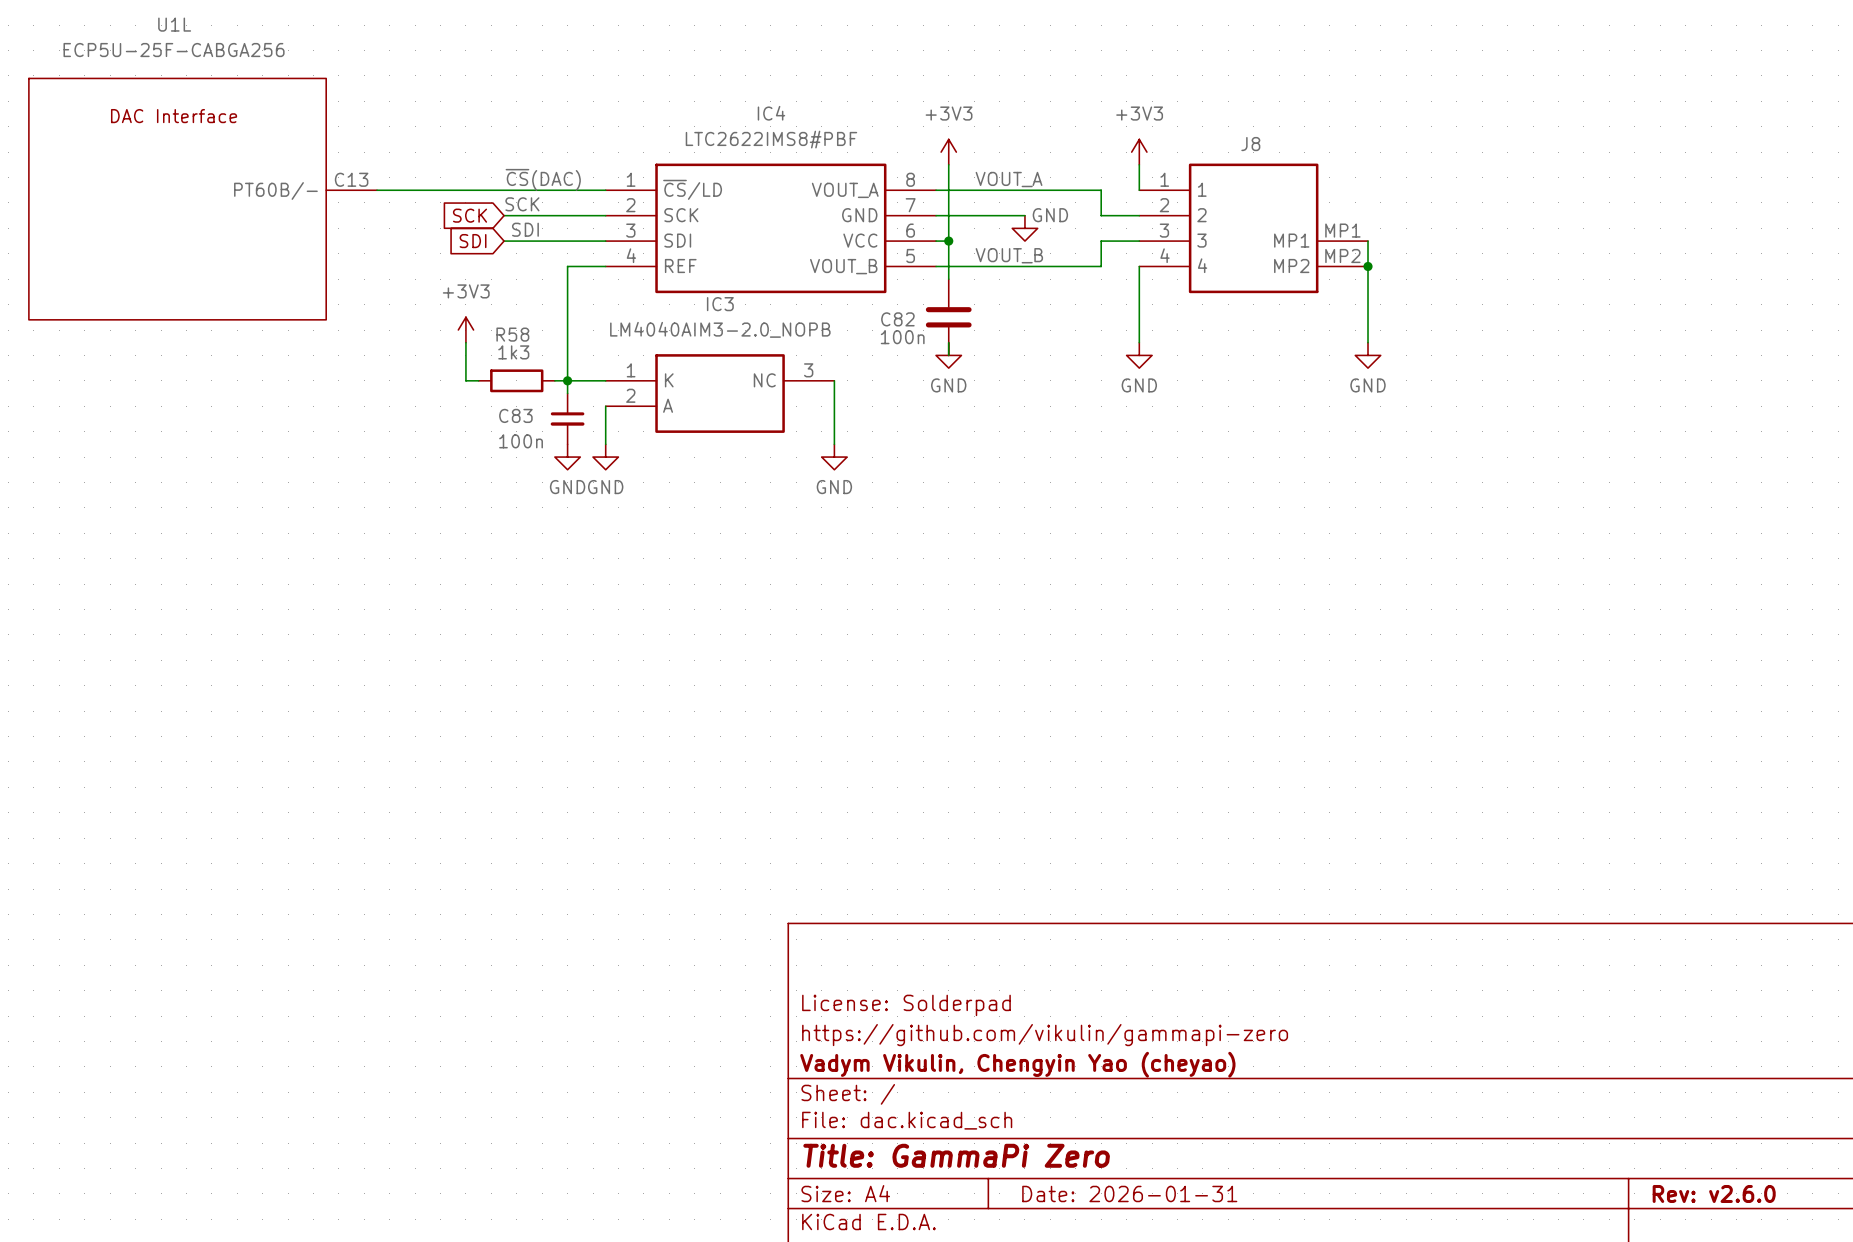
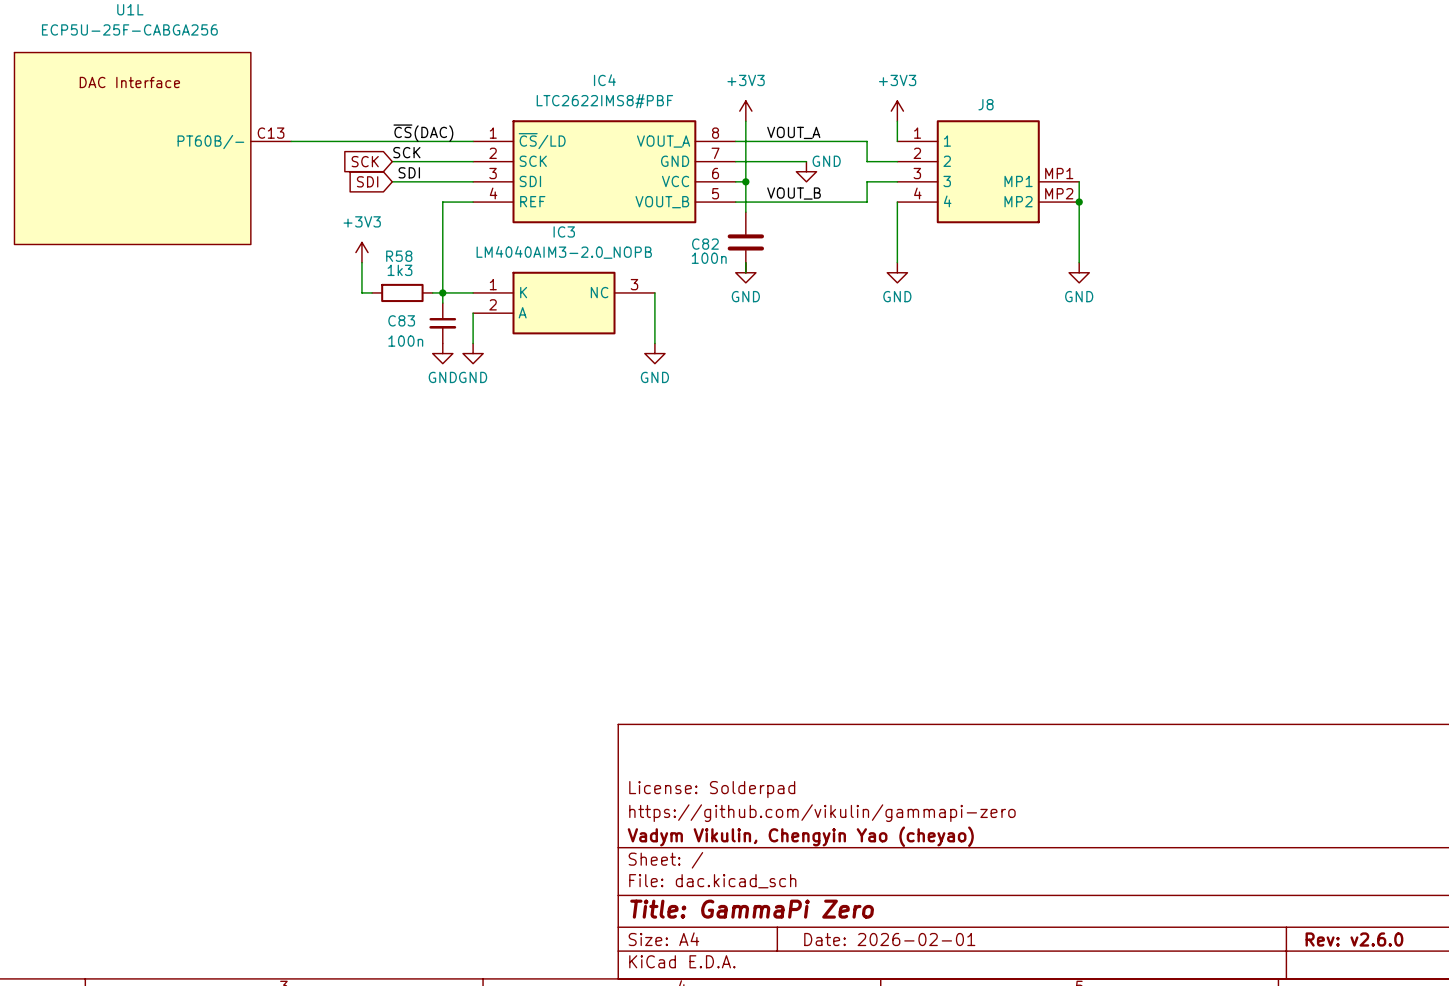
title block: Date: 2026-01-31 (1129, 1193) -> Date: 2026-02-01 (889, 939)

